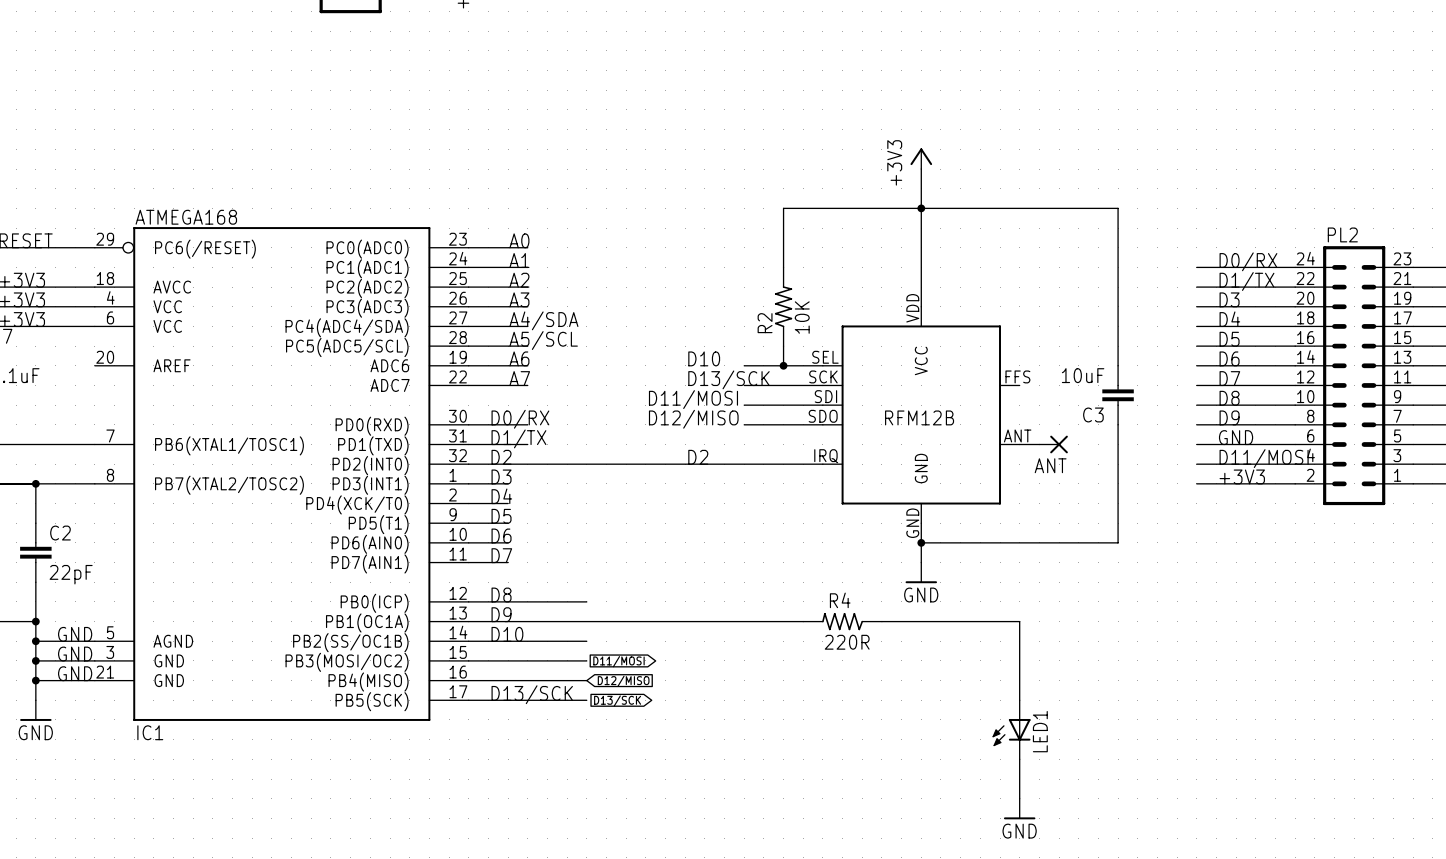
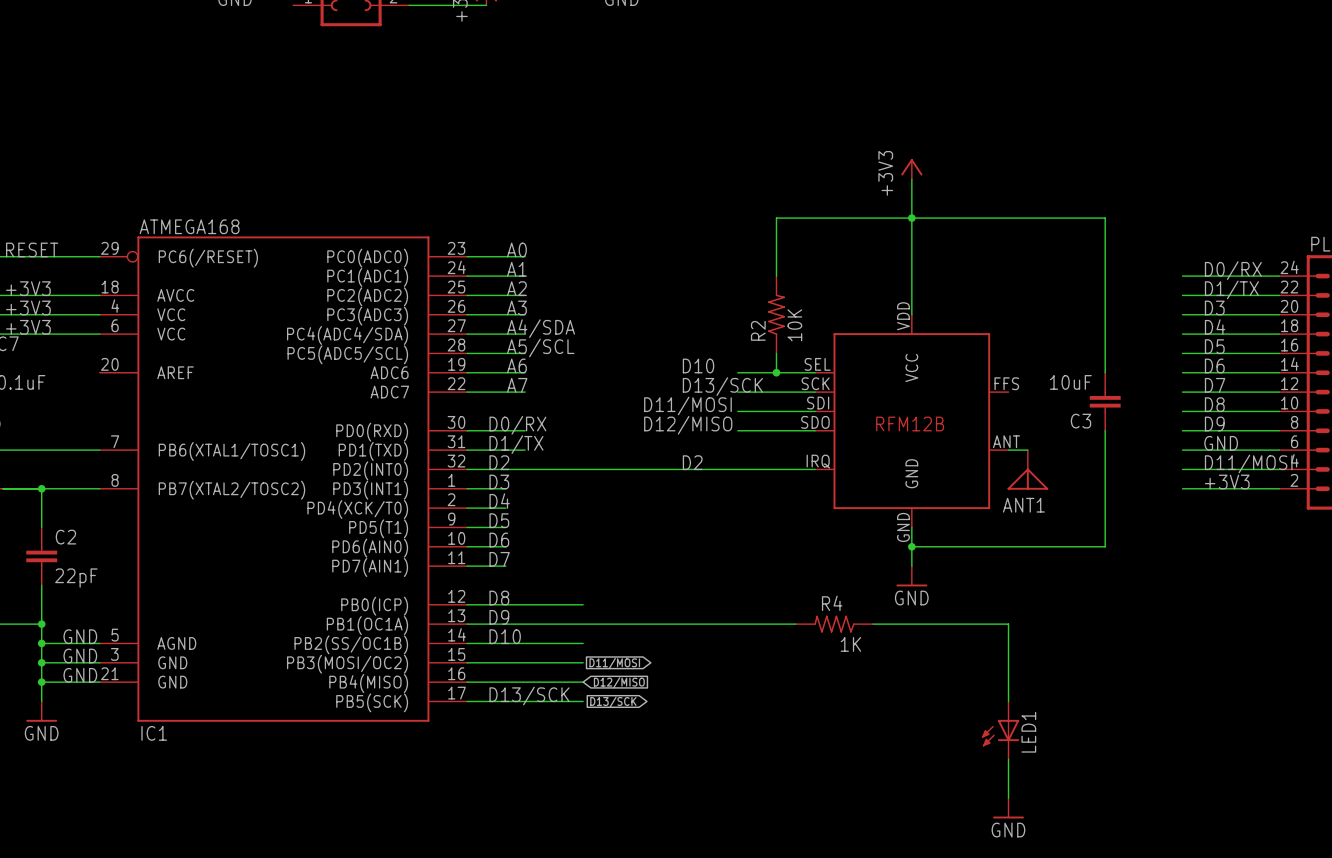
ANT: (1053, 444) -> none
ANT1: none -> (1027, 469)
R4 value: 220R (847, 642) -> 1K (850, 644)

